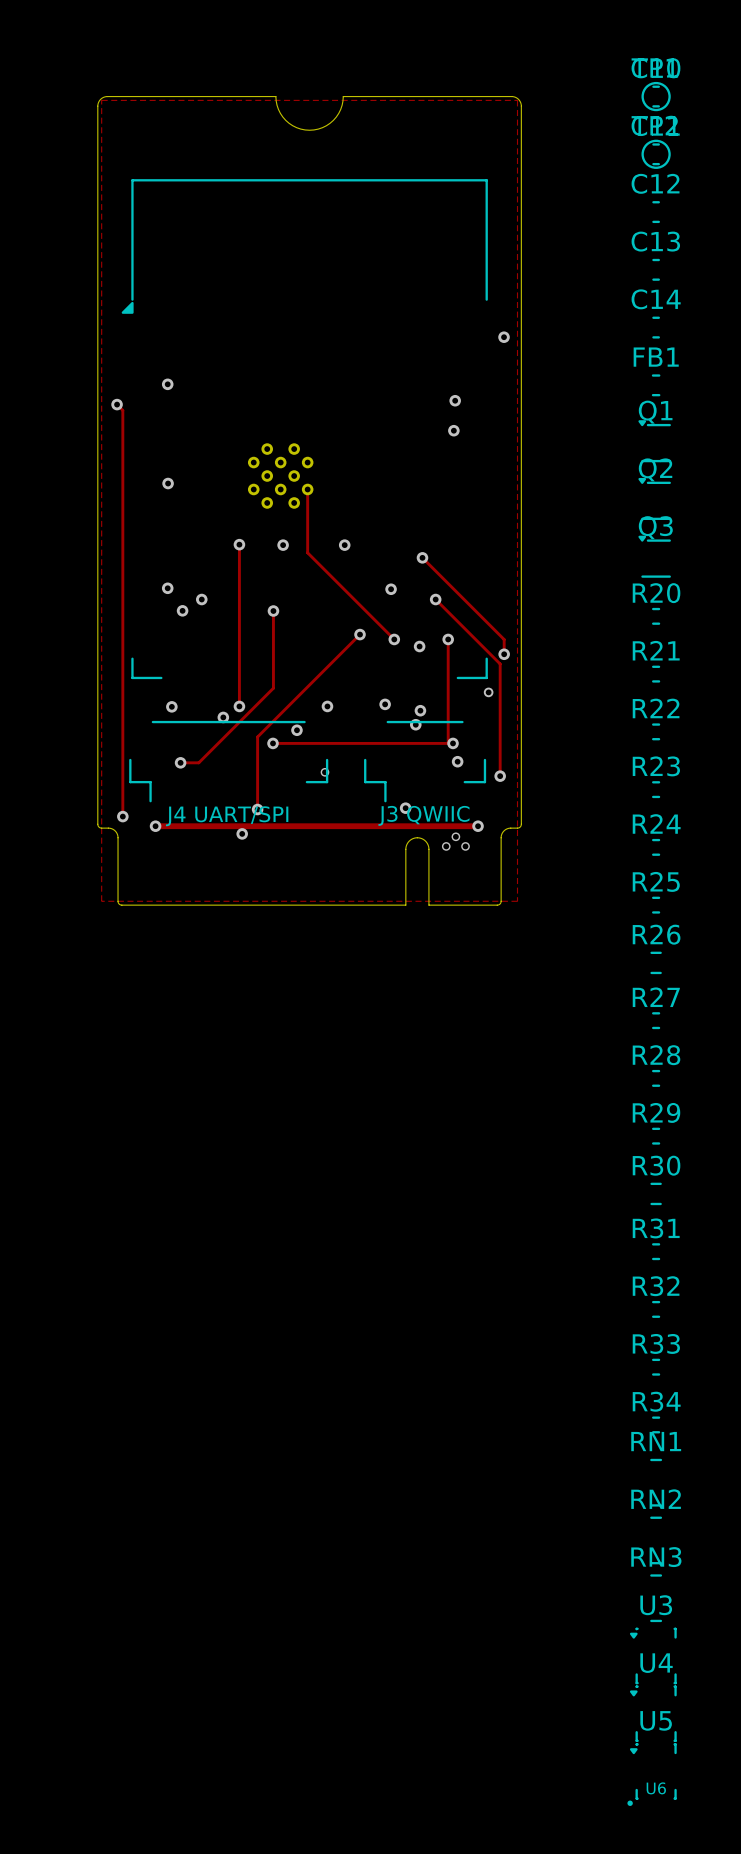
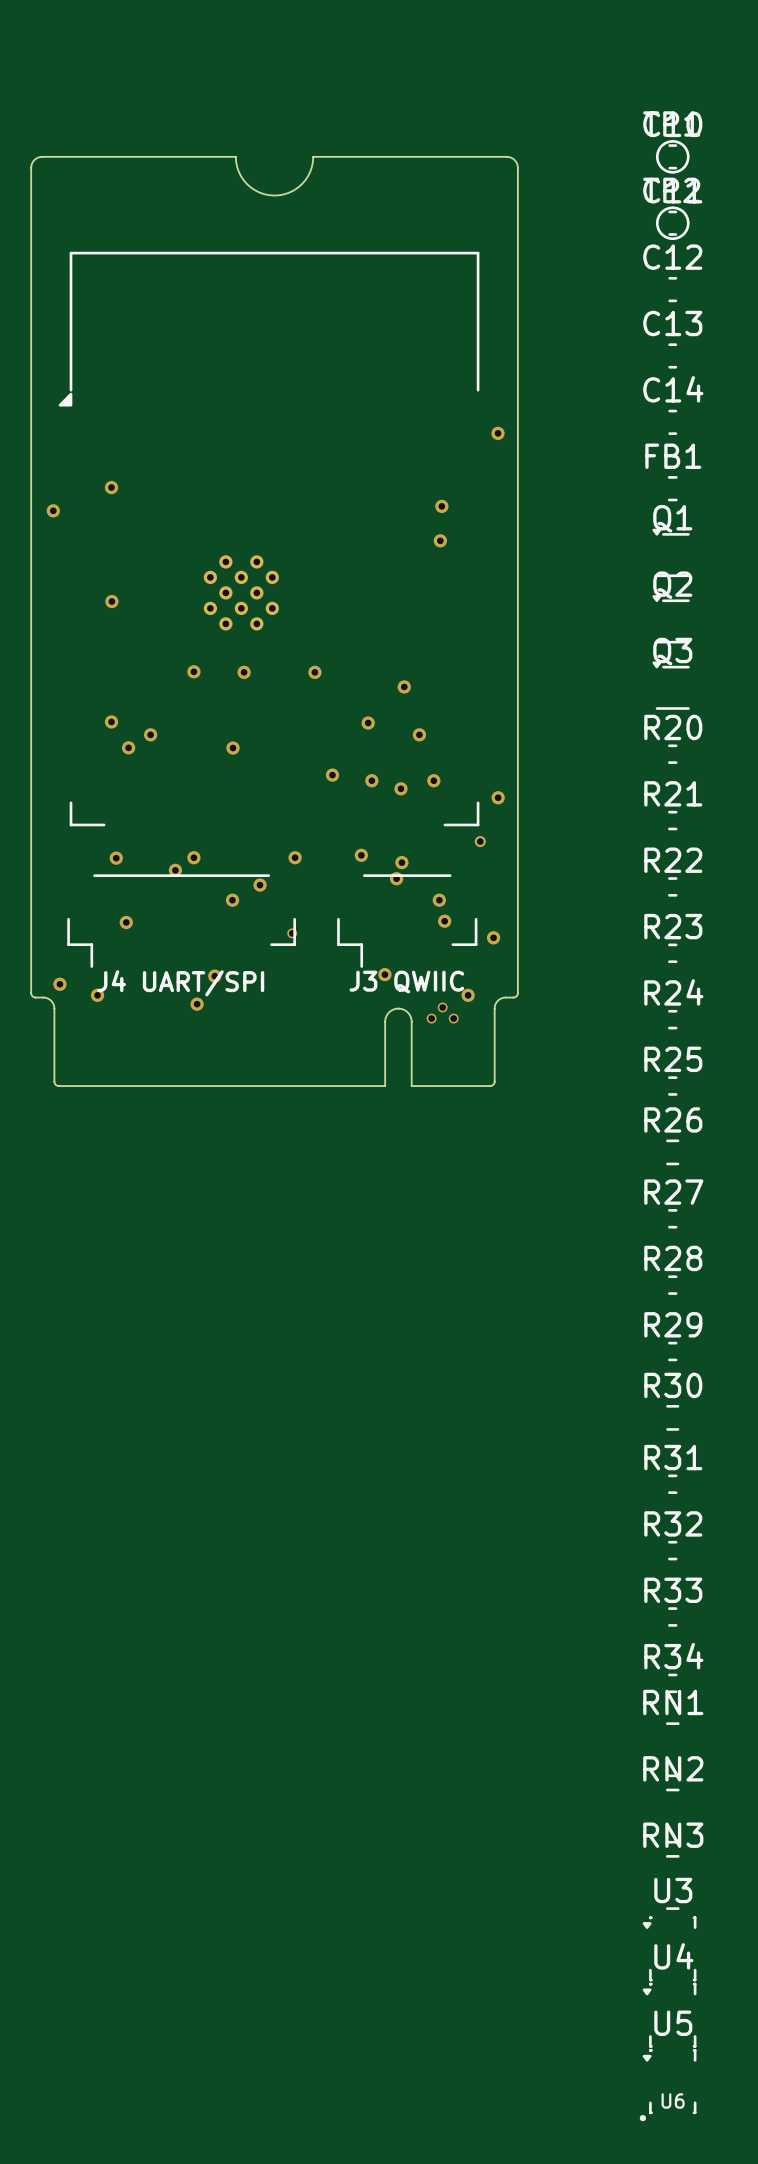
zone outline: (101, 100) (517, 100) (517, 901) (101, 901) (101, 100) -> none
track: (117, 404) (122, 410) (122, 816) -> none
track: (307, 489) (307, 552) (394, 639) -> none
track: (239, 544) (239, 706) -> none
track: (422, 557) (504, 639) (504, 654) -> none
track: (435, 599) (500, 664) (500, 776) -> none
track: (273, 611) (273, 688) (198, 762) (180, 762) -> none
track: (360, 634) (257, 736) (257, 809) -> none
track: (448, 639) (448, 743) -> none
track: (273, 743) (453, 743) -> none
track: (155, 826) (478, 826) -> none

